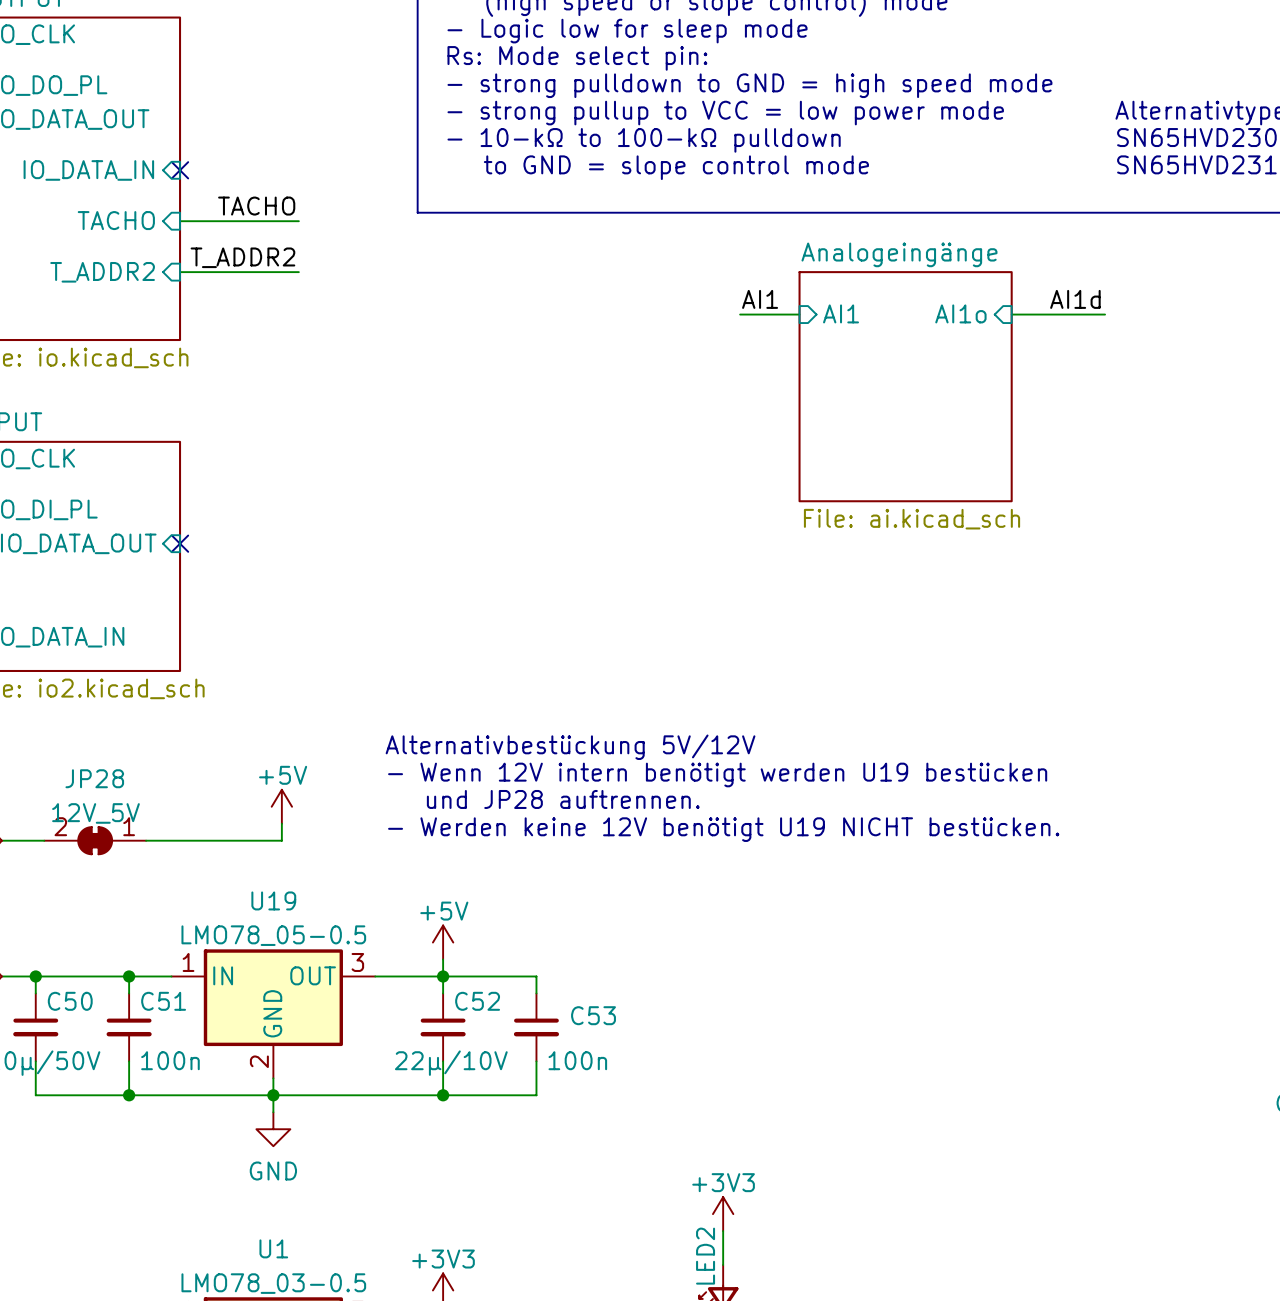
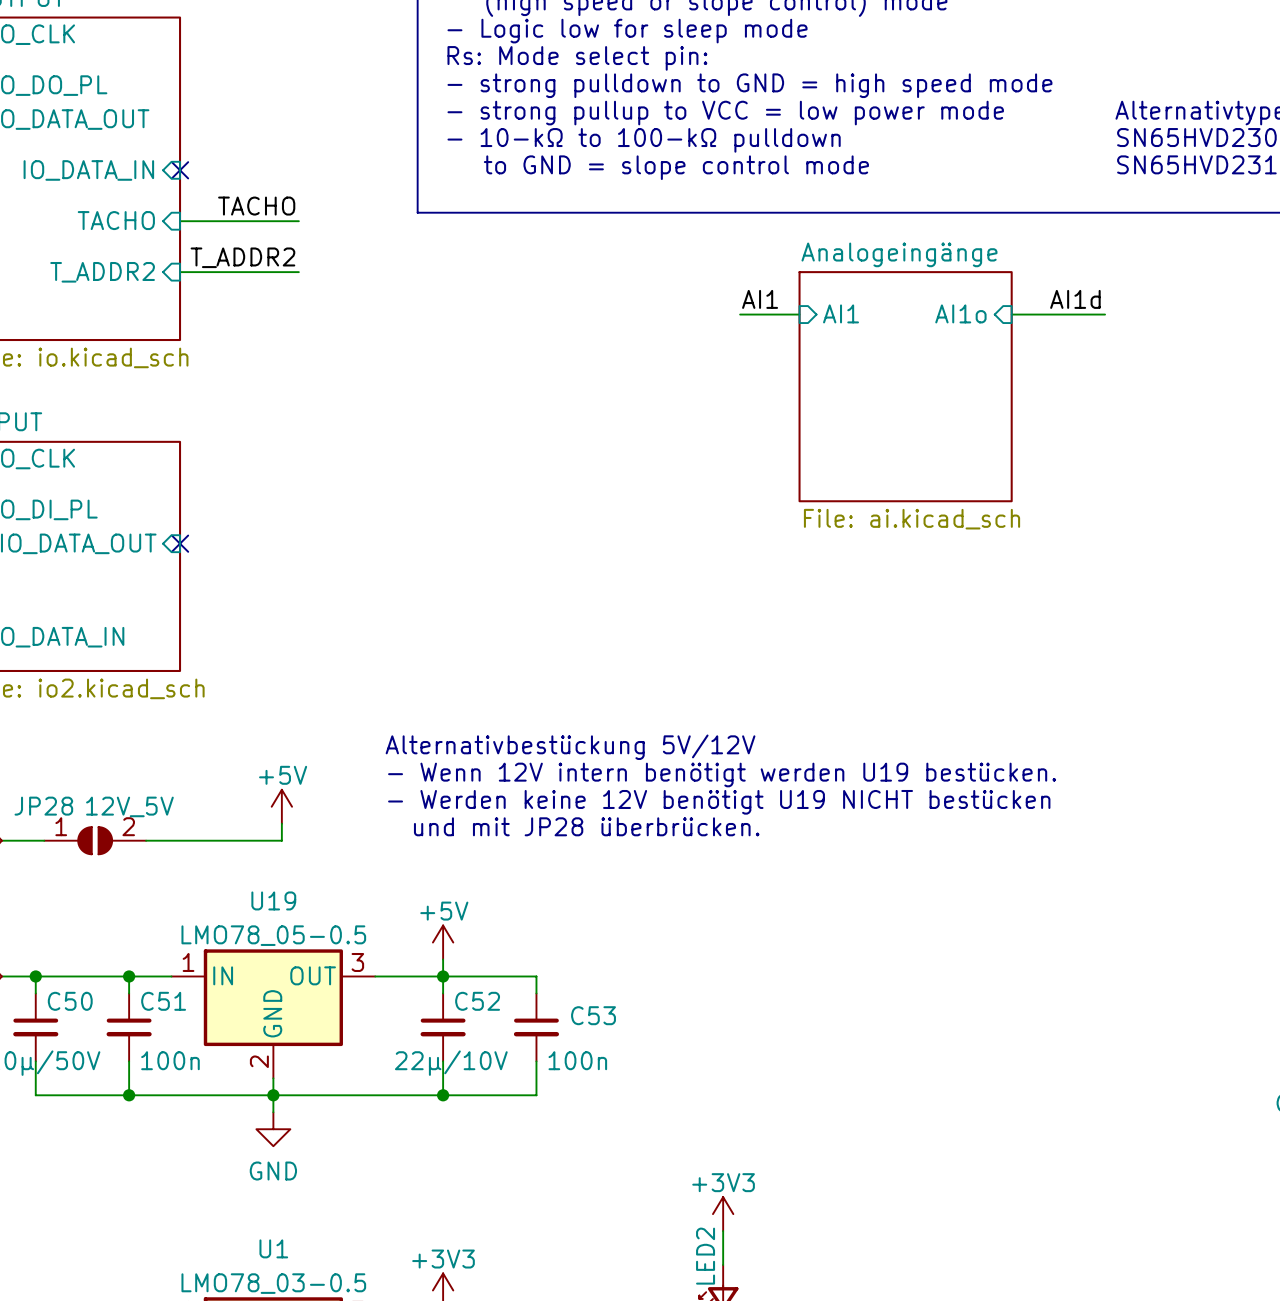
text: - Wenn 12V intern benötigt werden U19 bestücken (717, 774) -> - Wenn 12V intern benötigt werden U19 bestücken. (722, 774)
JP28 name position: JP28 (94, 778) -> JP28 (43, 806)
text: und JP28 auftrennen. (563, 799) -> - Werden keine 12V benötigt U19 NICHT bestücken (719, 802)
JP28 value position: 12V_5V (95, 813) -> 12V_5V (129, 806)
JP28 symbol: [44, 827, 147, 855] -> [44, 827, 147, 855]
text: - Werden keine 12V benötigt U19 NICHT bestücken. (723, 829) -> und mit JP28 überbrücken. (586, 826)

